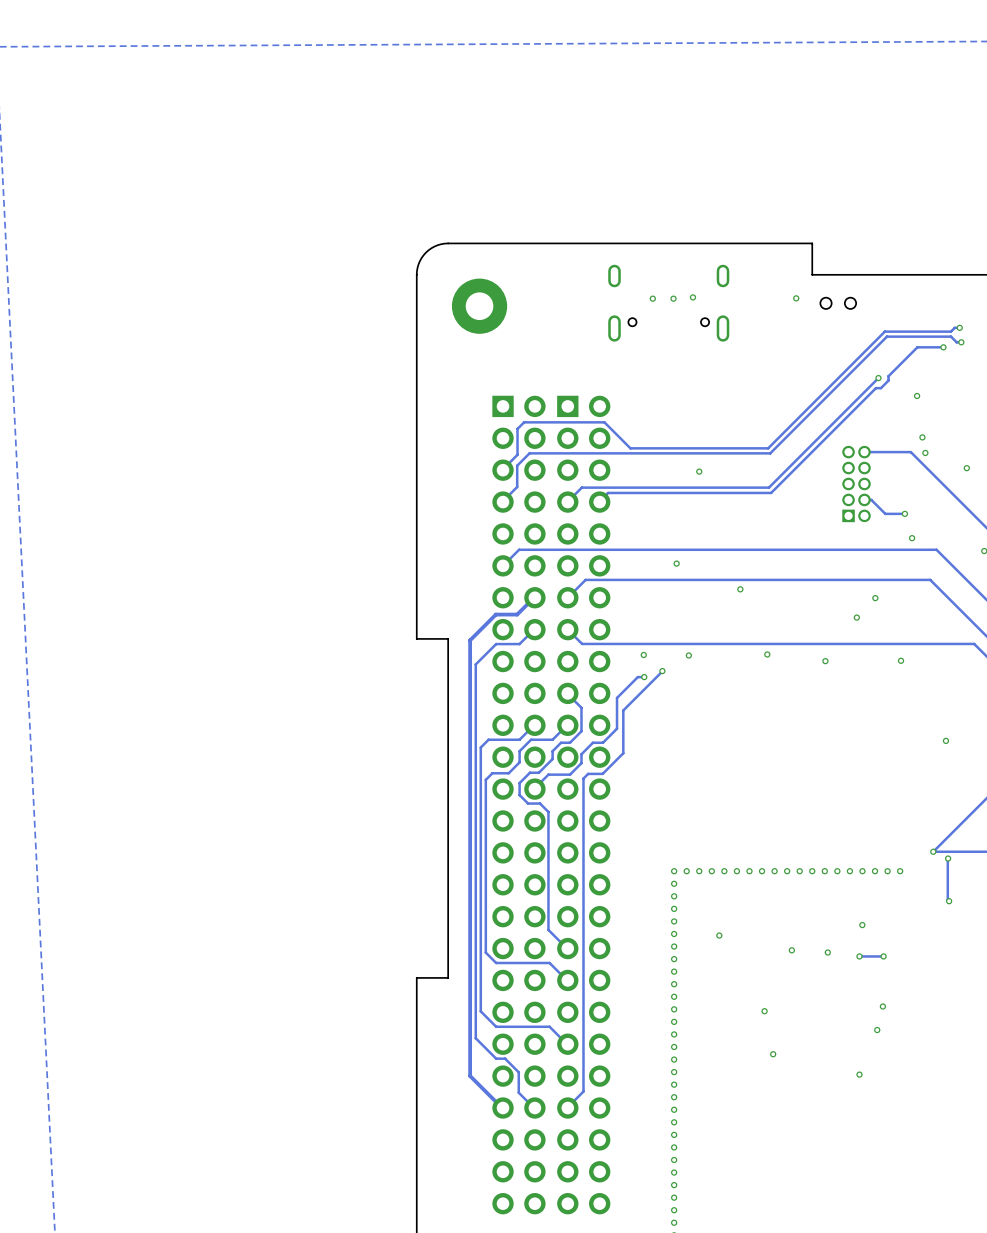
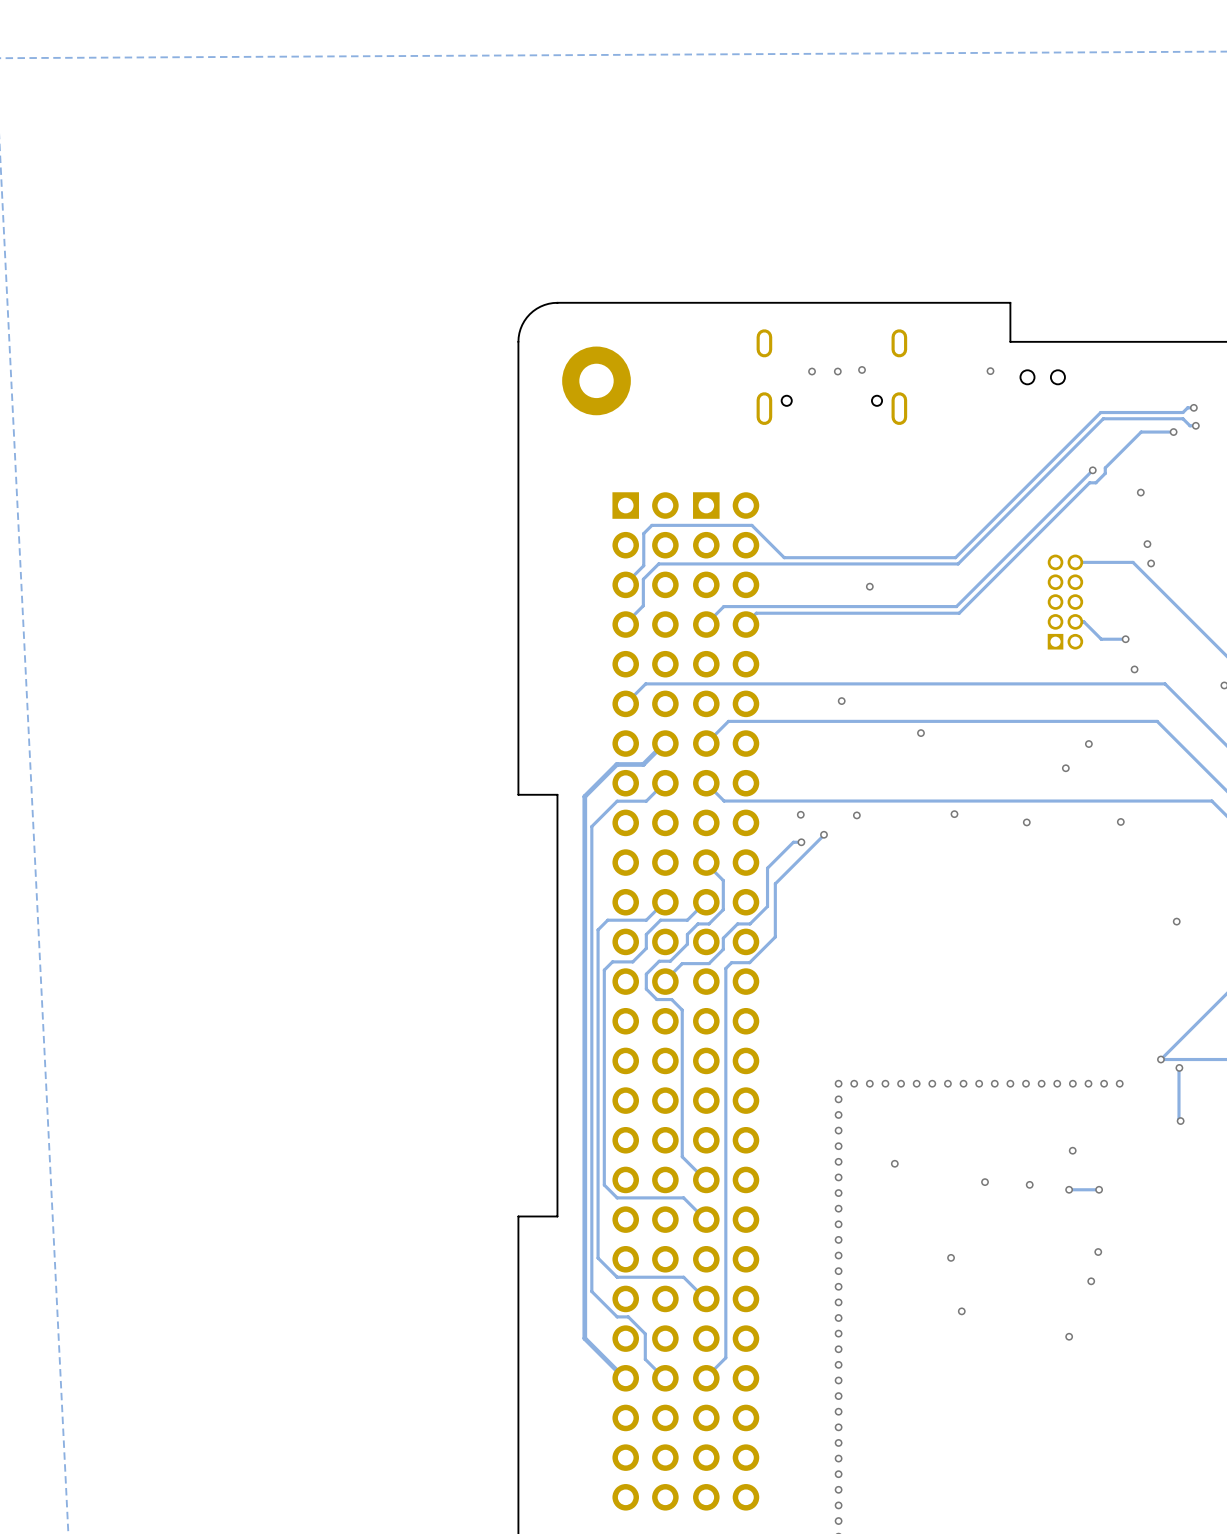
via: (966, 468) -> none

